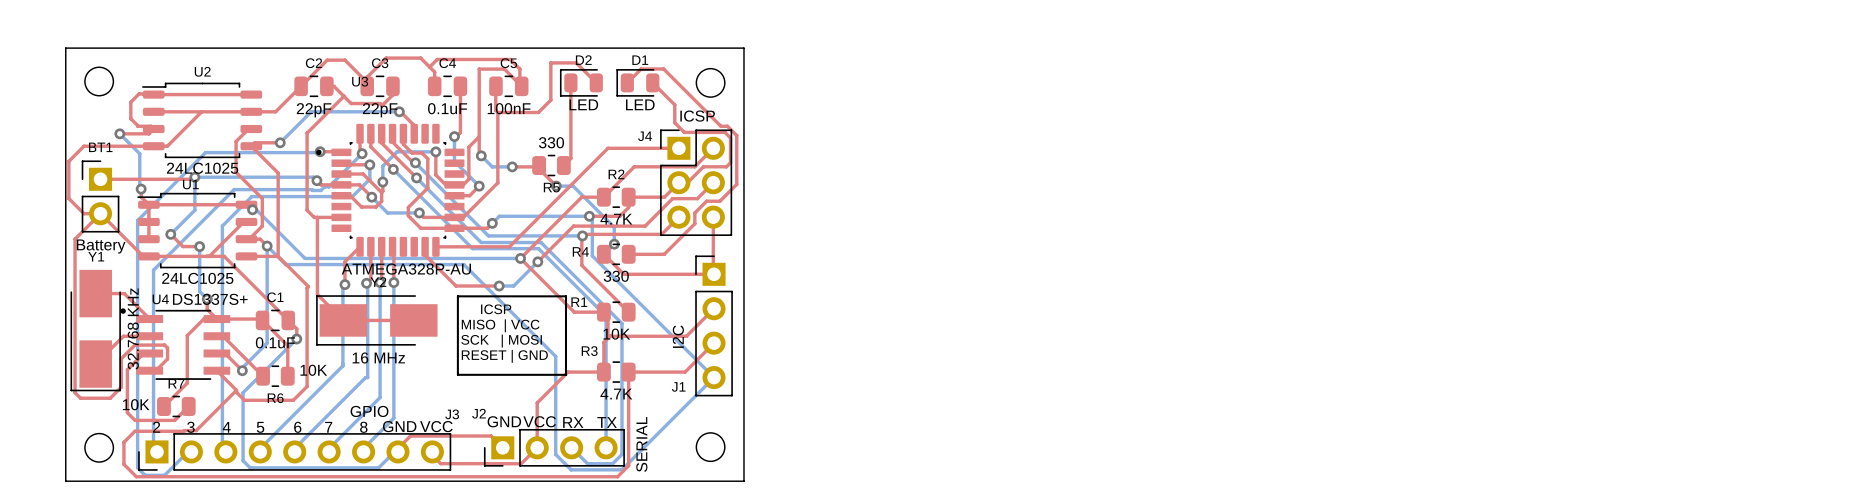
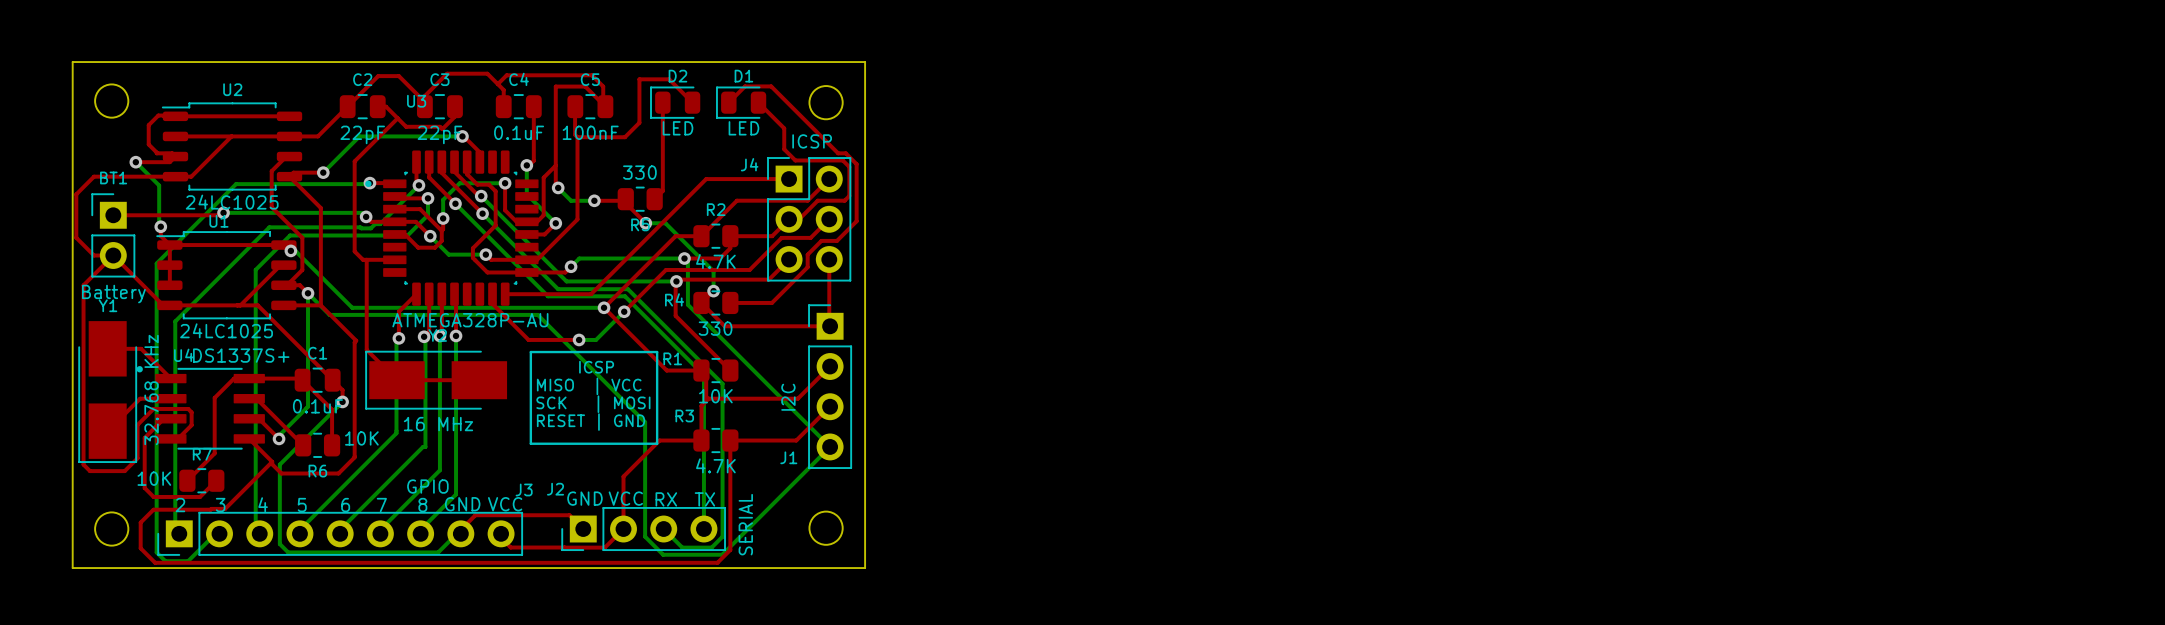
bottom track: (194, 177) (194, 210) (170, 234) -> none
top track: (170, 234) (182, 246) (199, 246) -> none
via: (170, 234) -> none
bottom track: (199, 246) (199, 291) (207, 299) -> none
via: (199, 246) -> none
top track: (207, 299) (207, 309) (216, 319) -> none
via: (207, 299) -> none

